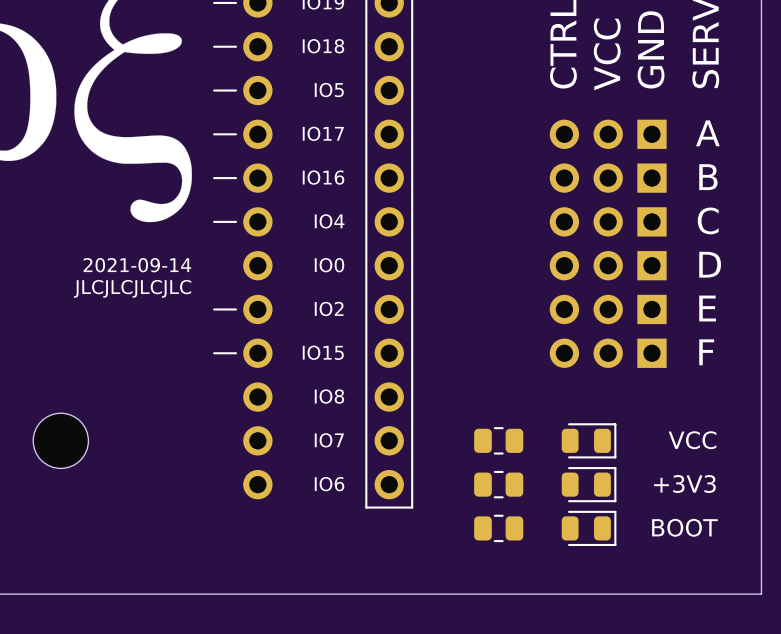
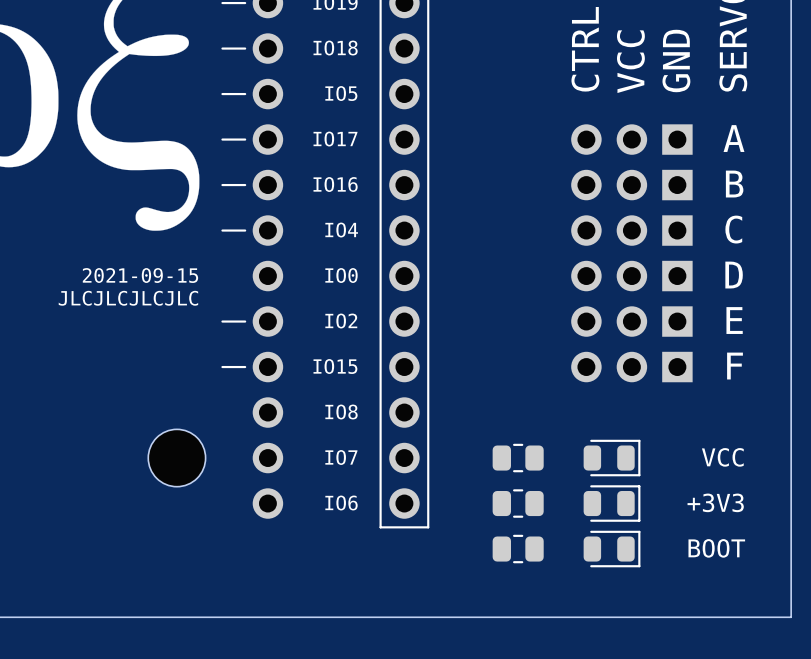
text: 2021-09-14 (137, 265) -> 2021-09-15 (140, 275)
part position: (60, 440) -> (176, 458)

